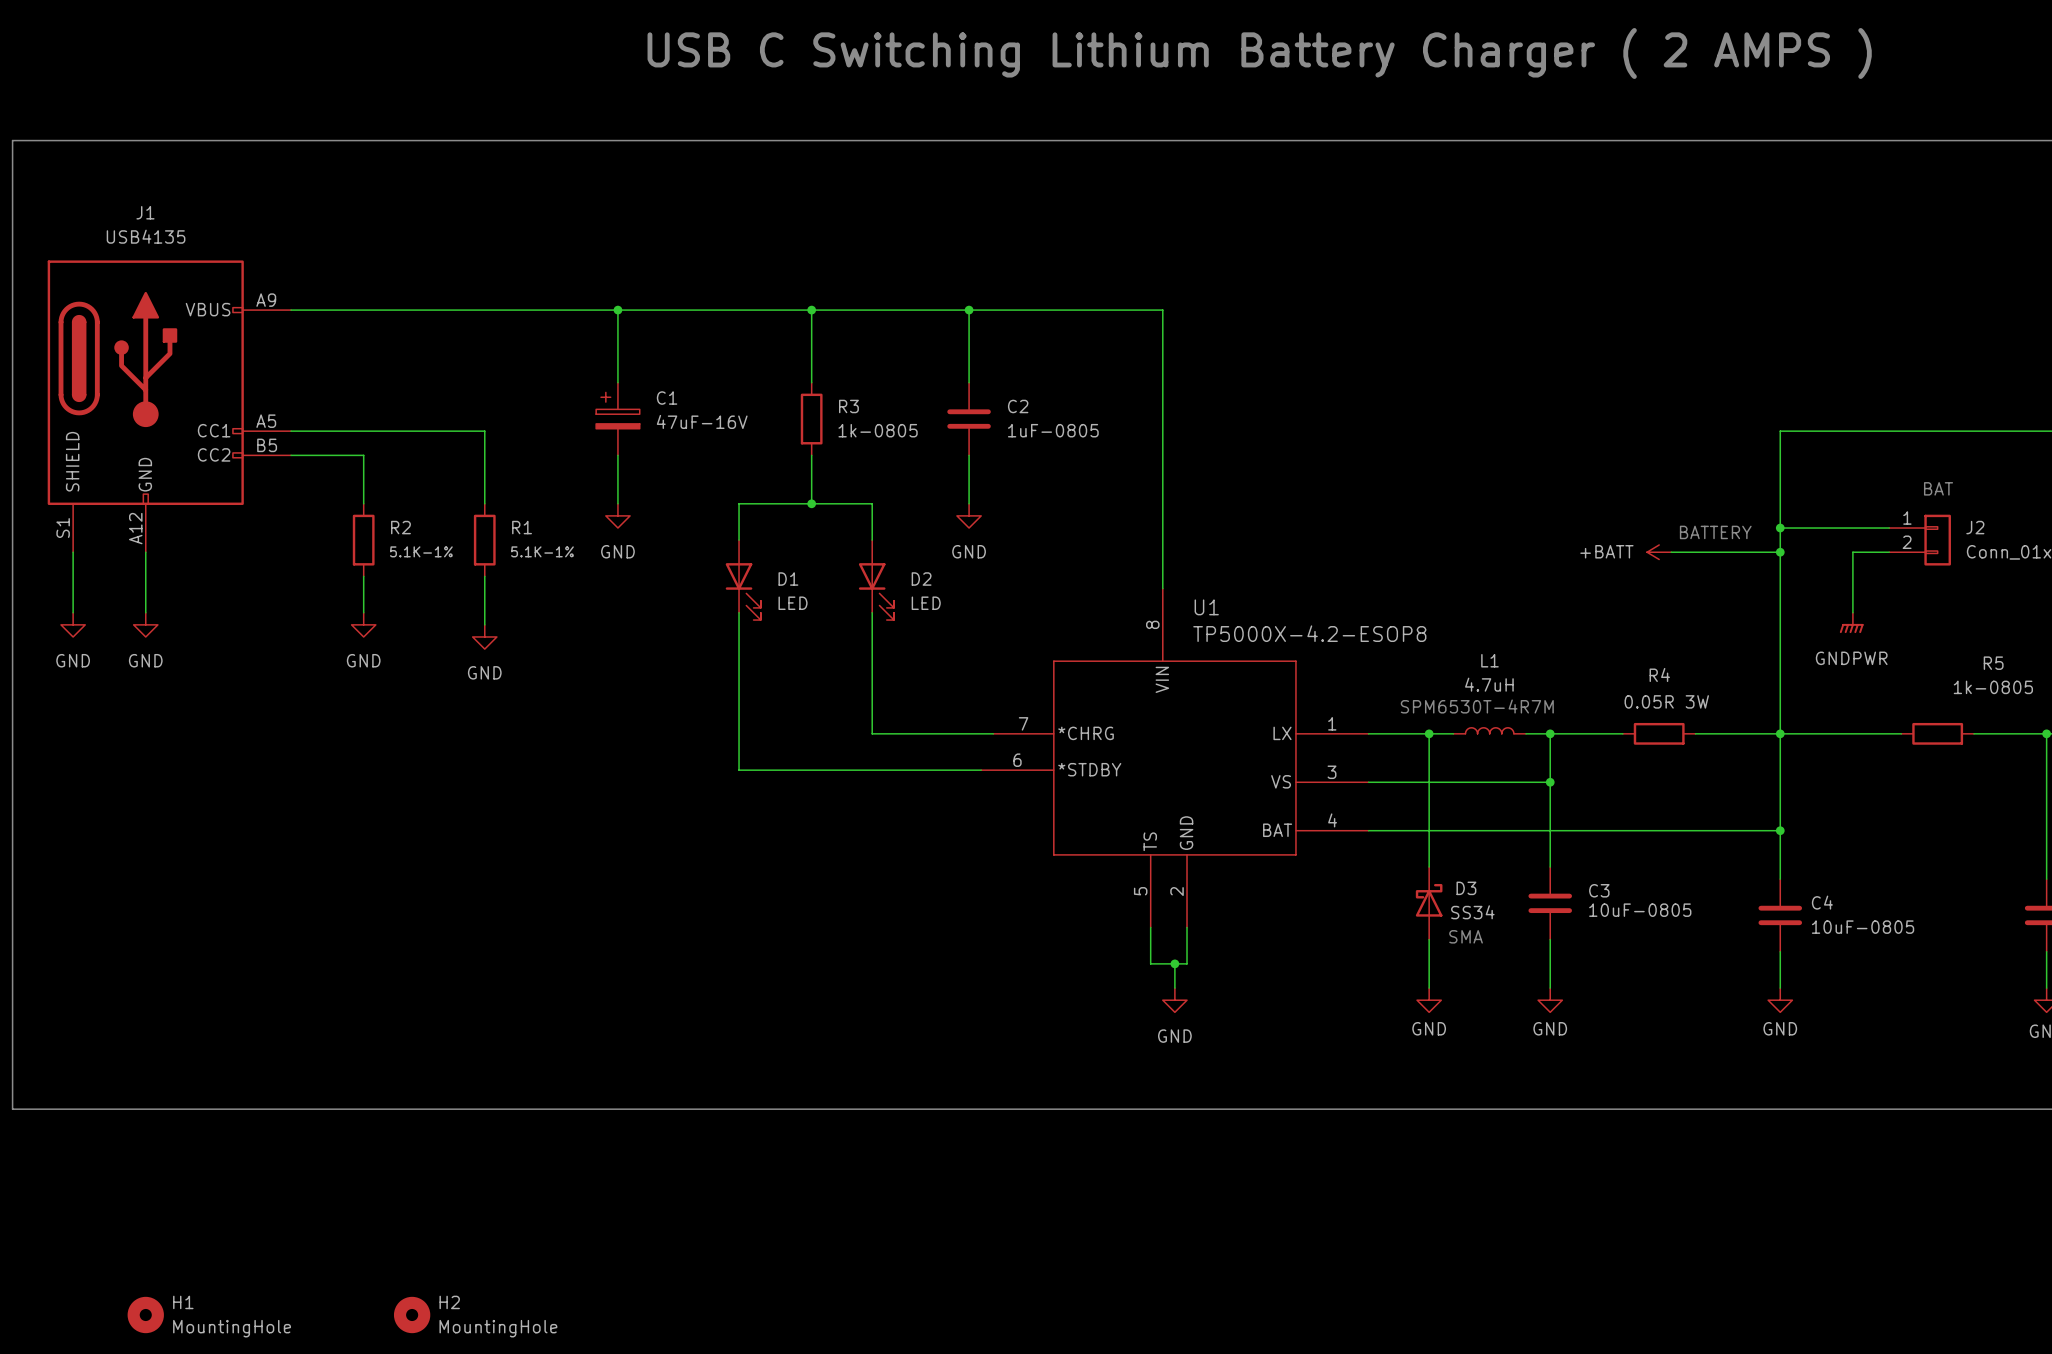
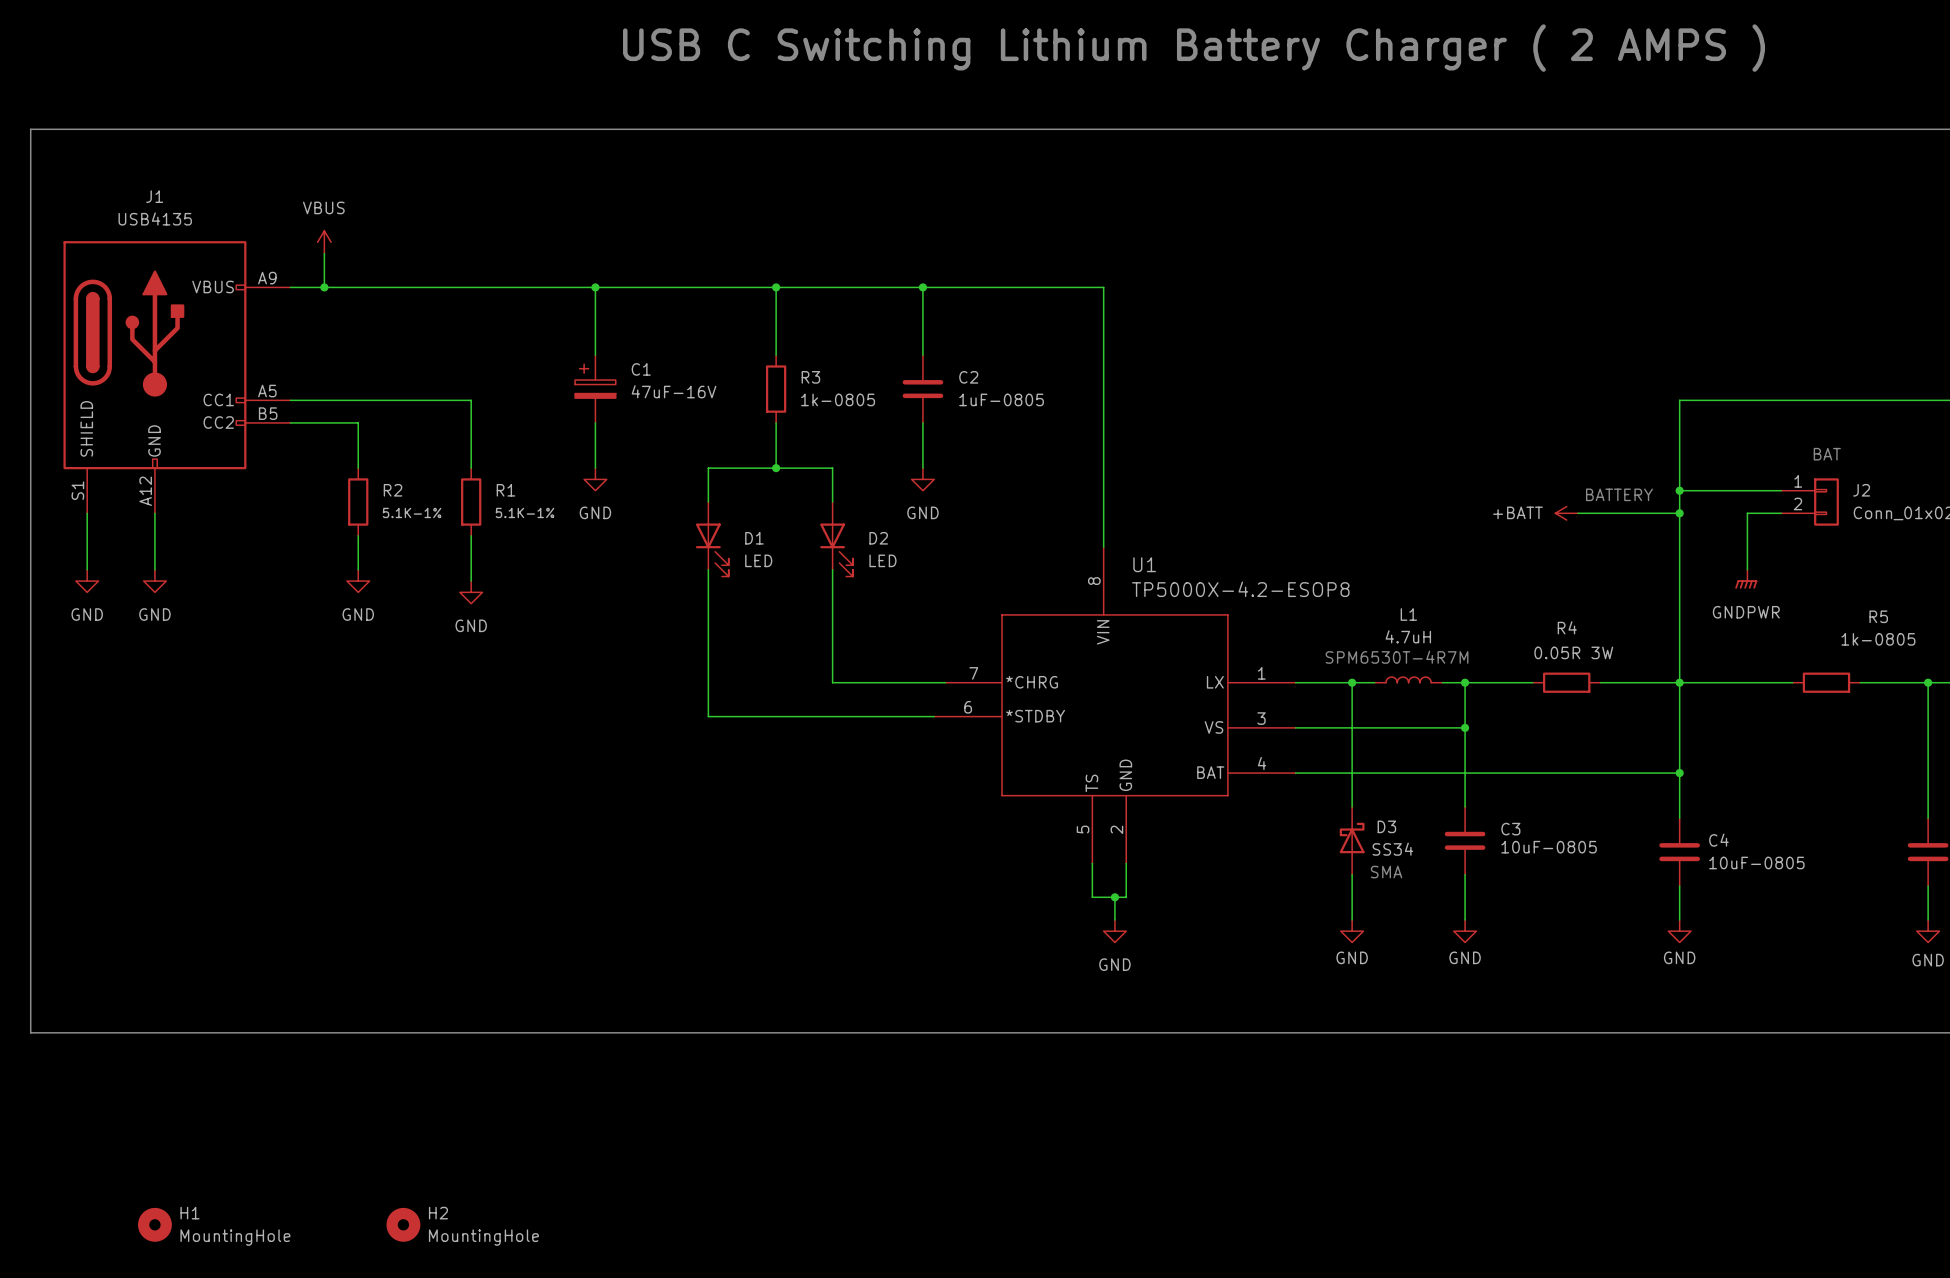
power symbol: none -> VBUS (324, 242)
wire: none -> (324, 253) (324, 287)
junction: none -> (324, 287)

